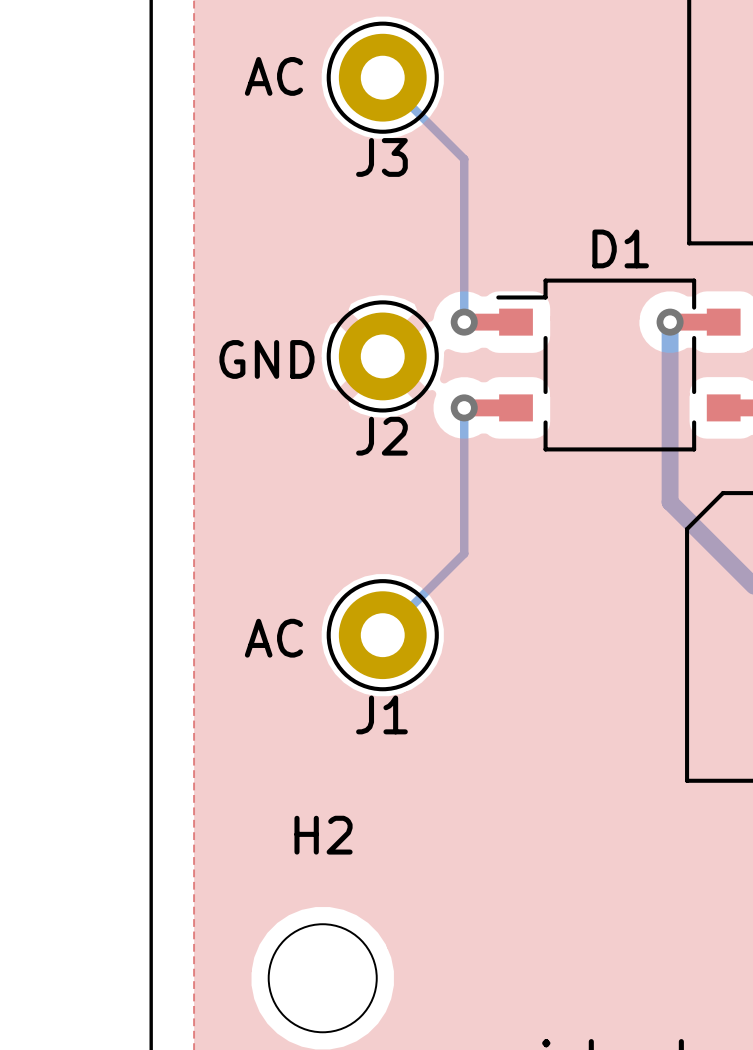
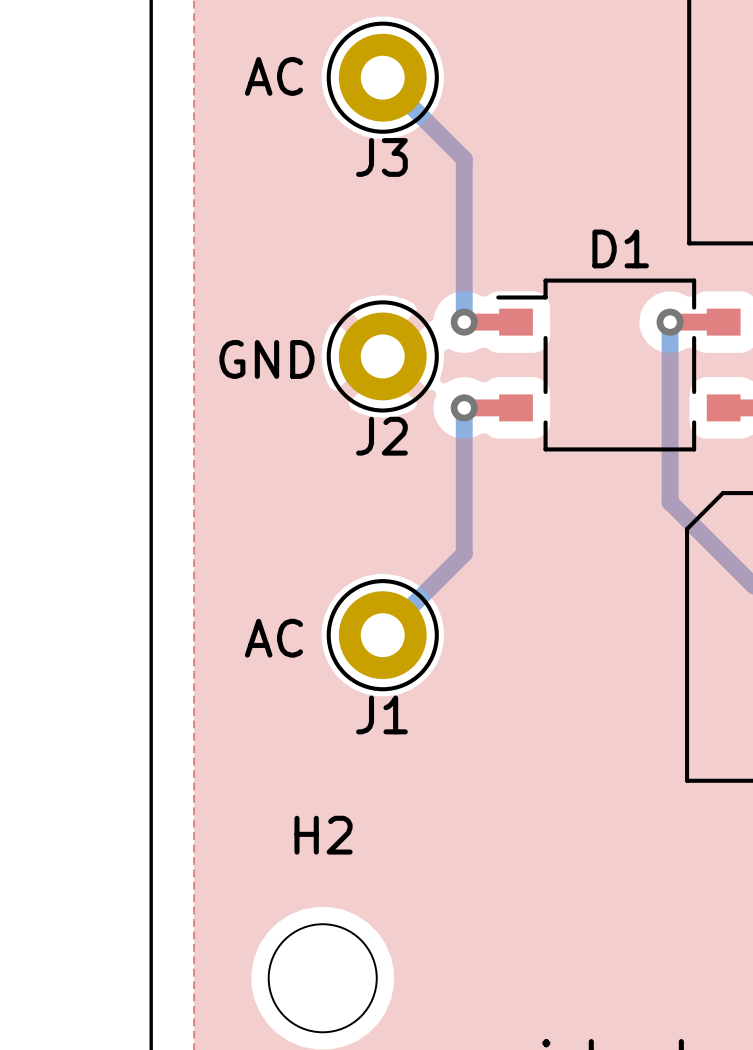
bottom track width: thin (382, 77) (464, 159) (464, 322) -> thick (382, 77) (464, 159) (464, 322)
bottom track width: thin (464, 407) (464, 553) (382, 635) -> thick (464, 407) (464, 553) (382, 635)

